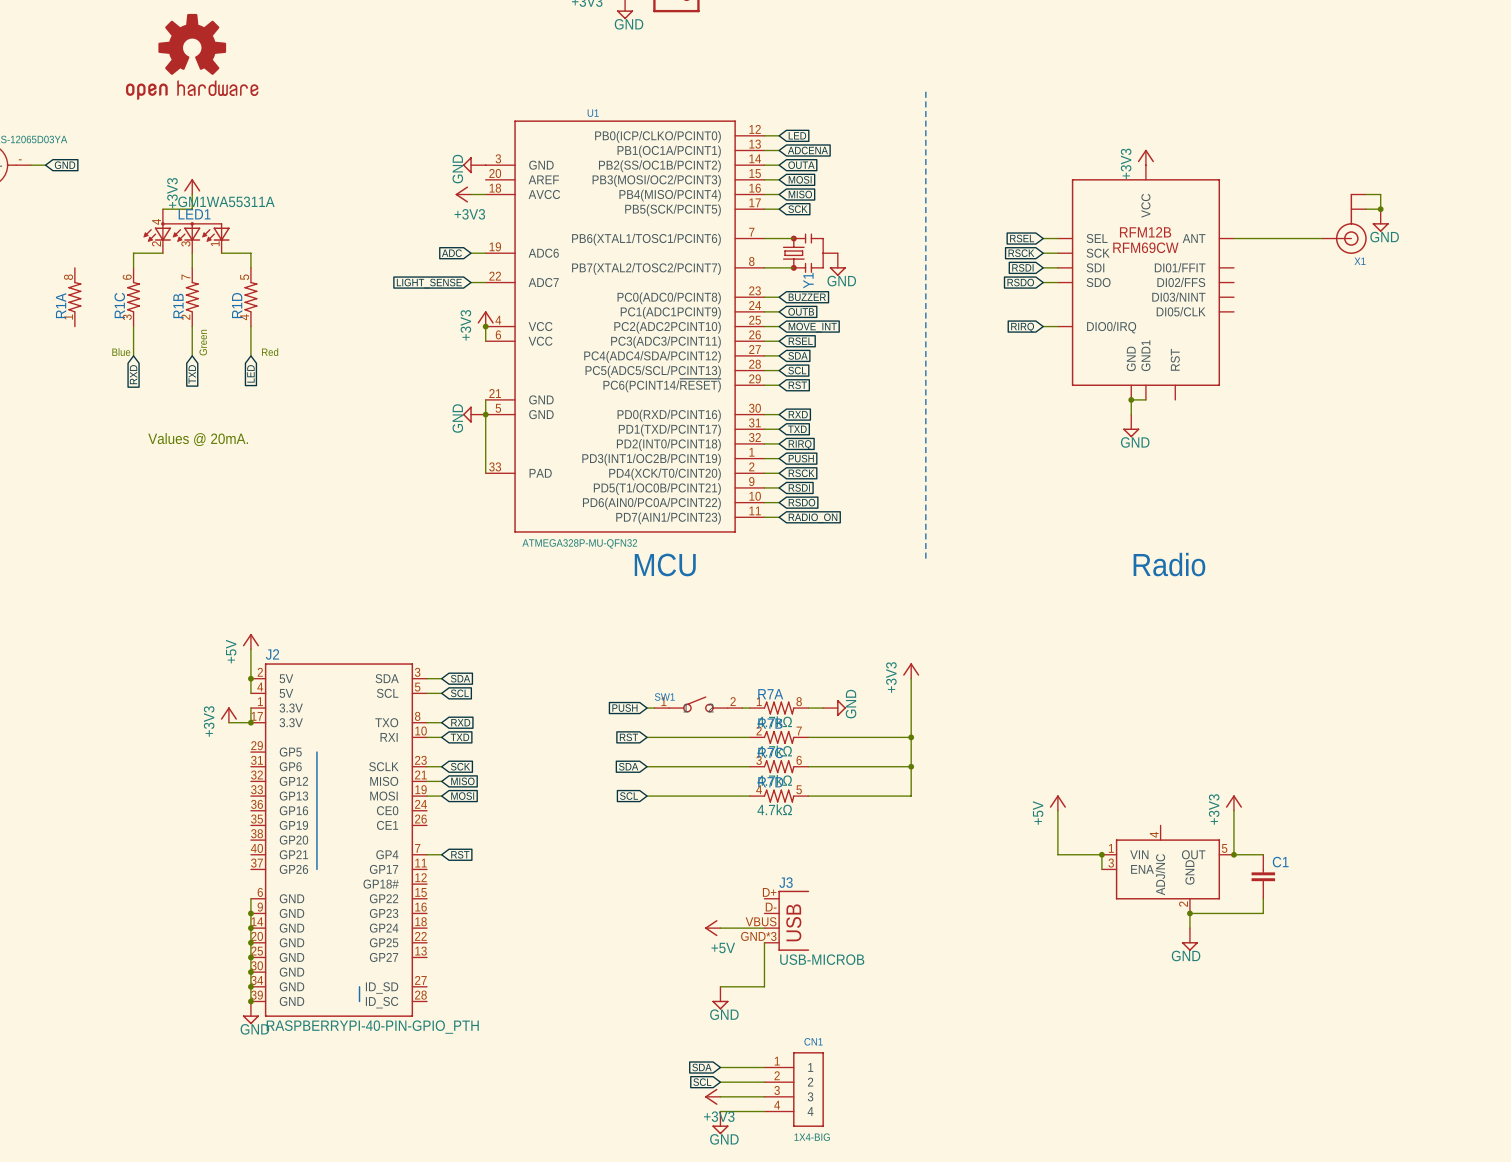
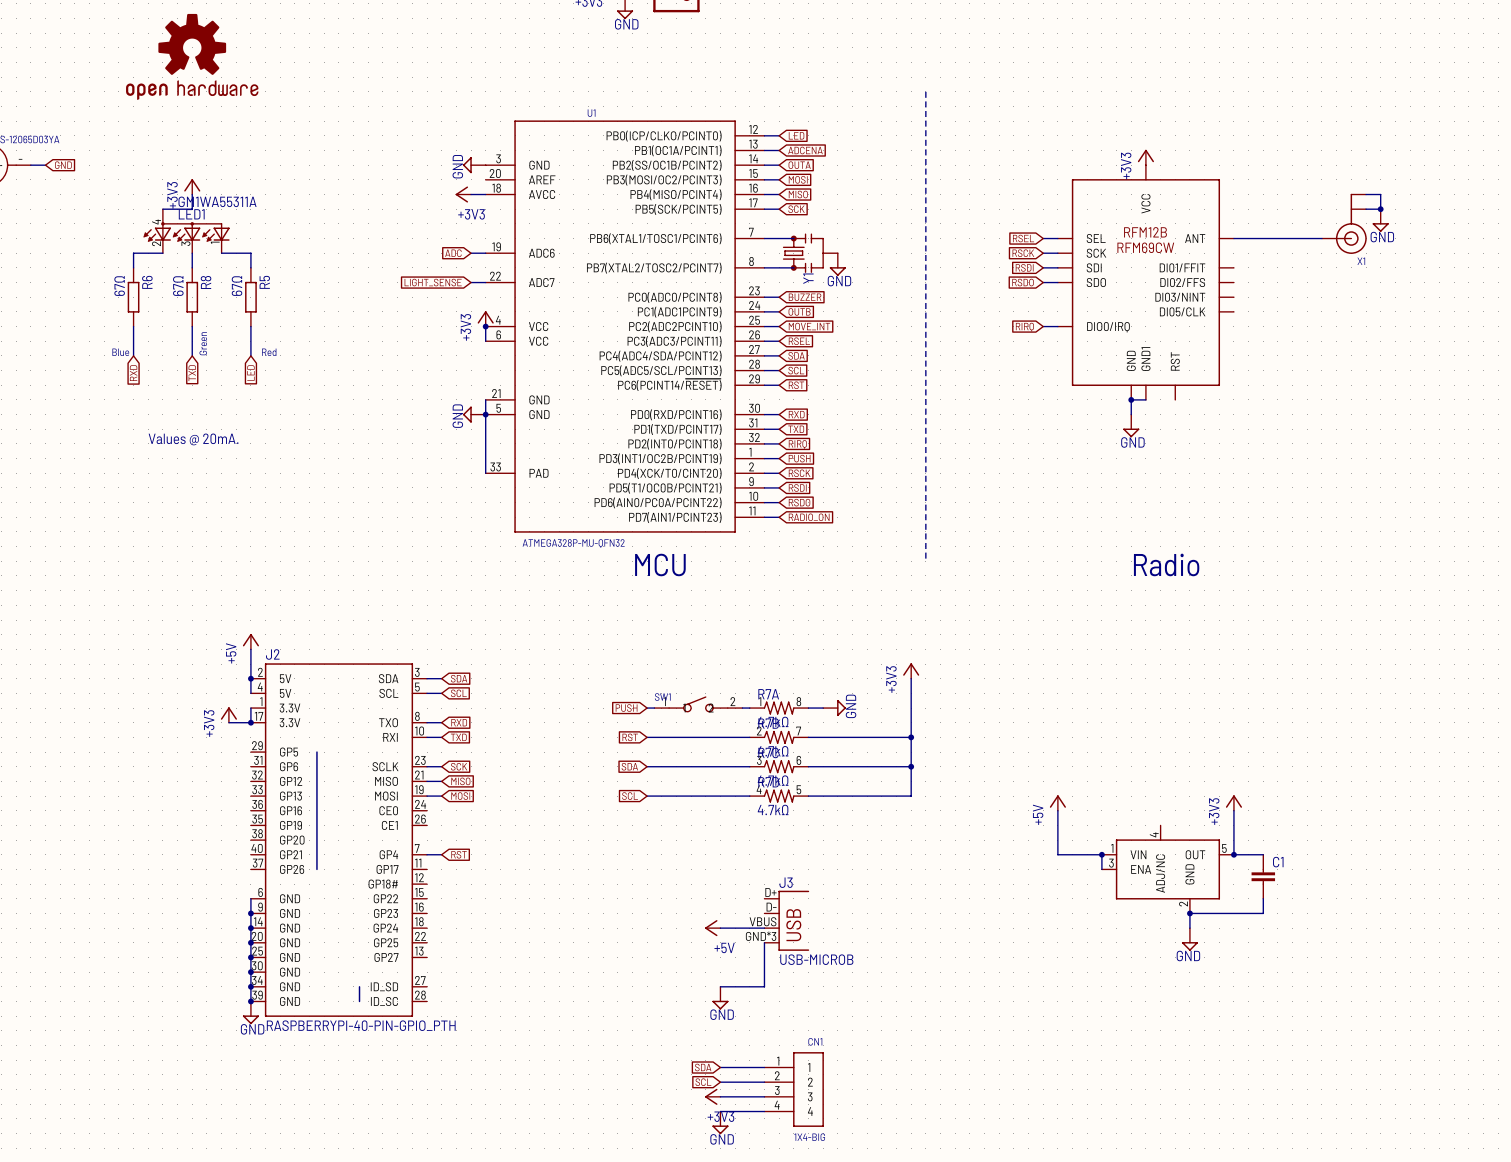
R1A: (74, 297) -> none
R1C: (133, 297) -> none
R6: none -> 67Ω (133, 297)
R1B: (192, 297) -> none
R8: none -> 67Ω (192, 297)
R1D: (250, 297) -> none
R5: none -> 67Ω (250, 297)

